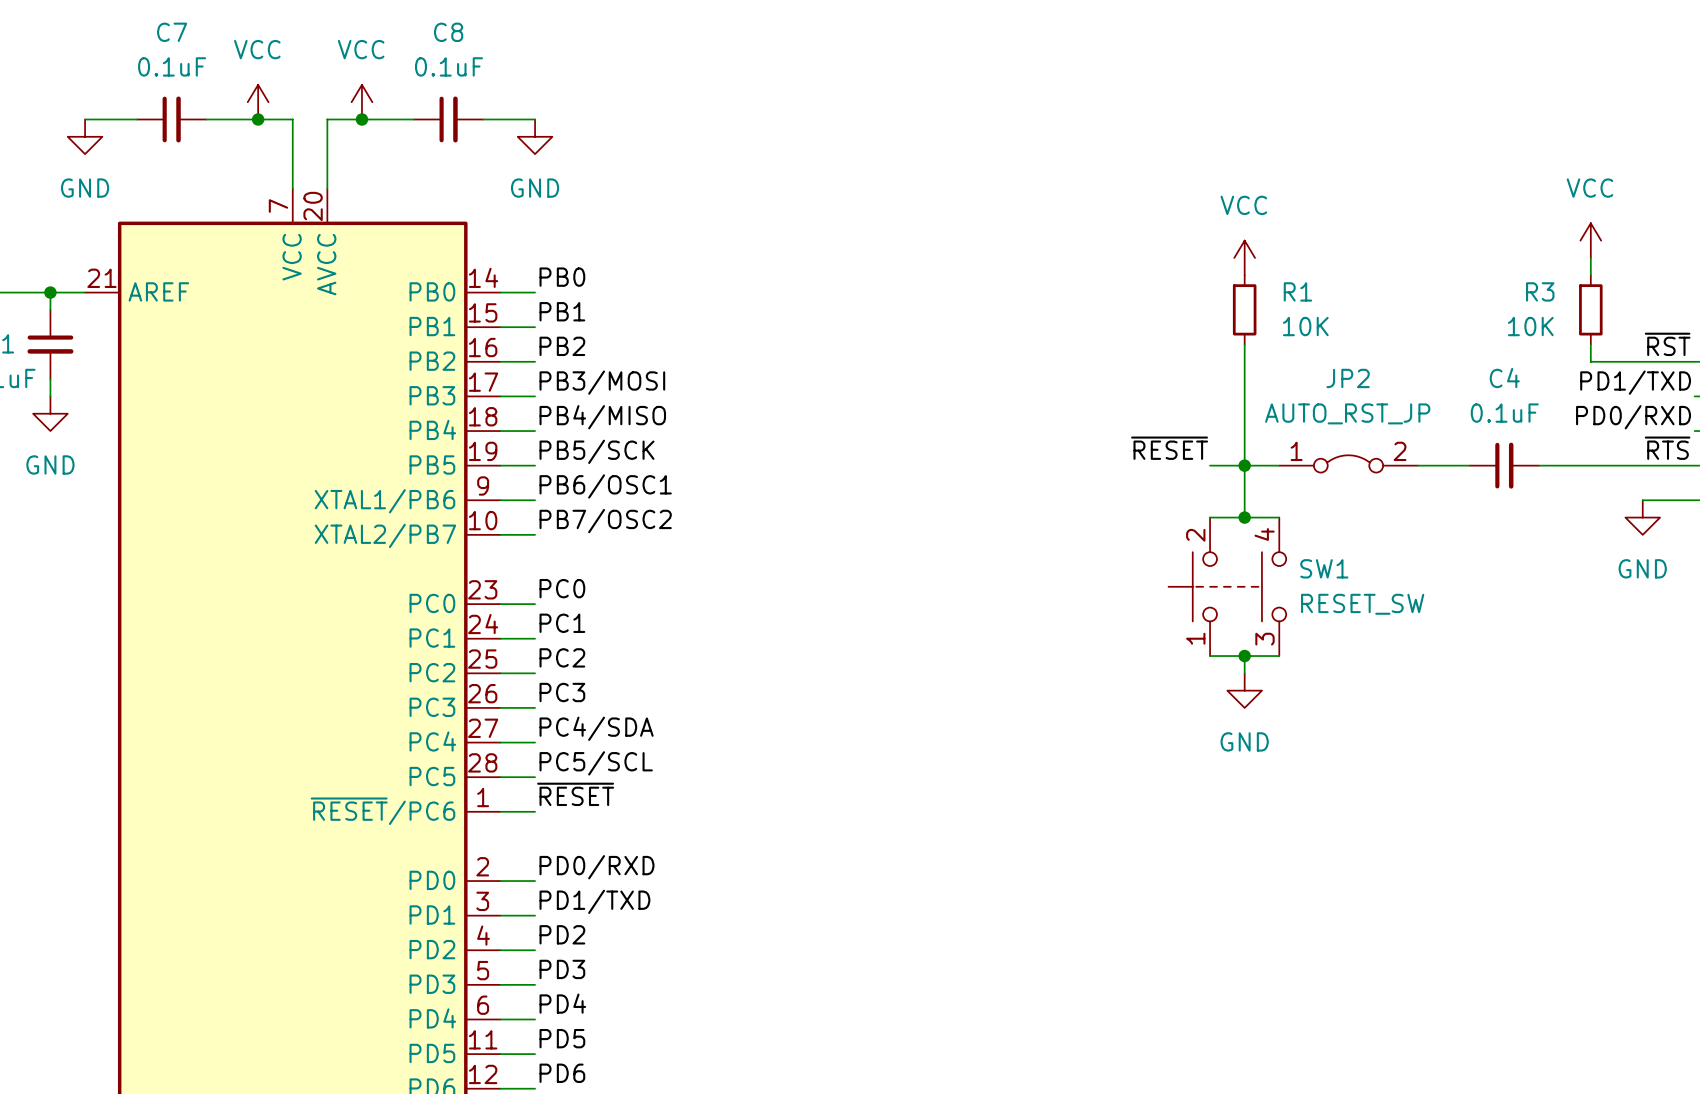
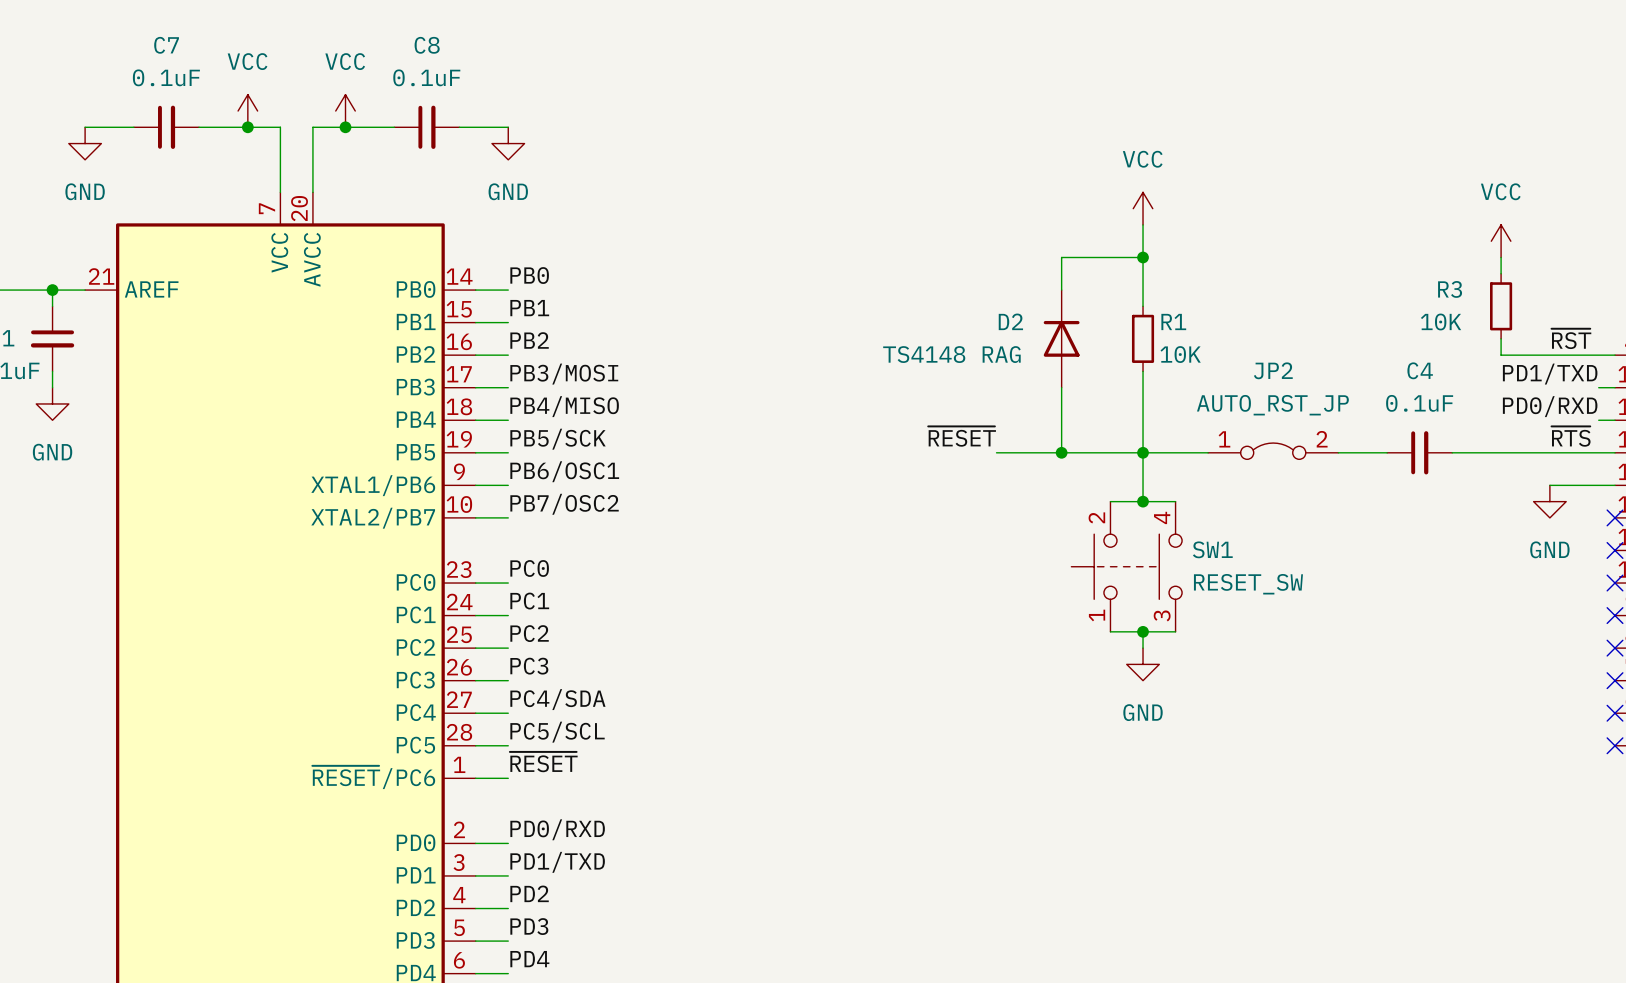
wire: none -> (1143, 224) (1143, 306)
wire: none -> (1143, 257) (1061, 257) (1061, 290)
junction: none -> (1143, 257)
power symbol position: VCC (1244, 257) -> VCC (1143, 208)
R1 name position: R1 (1297, 291) -> R1 (1173, 321)
R1 position: (1244, 309) -> (1143, 338)
R1 value position: 10K (1305, 326) -> 10K (1180, 354)
D2: none -> TS4148 RAG (1061, 338)
wire: (1244, 344) (1244, 517) (1279, 517) -> none
wire: none -> (1143, 371) (1143, 501) (1110, 501)
wire: none -> (1061, 387) (1061, 452)
label position: ~{RESET} (1169, 448) -> ~{RESET} (962, 436)
wire: none -> (996, 452) (1143, 452)
junction: none -> (1061, 452)
junction: none -> (1143, 452)
junction: (1244, 465) -> none
junction: none -> (1143, 501)
junction: (1244, 517) -> none
SW1 position: (1227, 586) -> (1126, 566)
wire: none -> (1110, 631) (1143, 631) (1143, 648)
junction position: (1244, 656) -> (1143, 631)
wire: (1279, 656) (1244, 656) (1244, 673) -> none
power symbol position: GND (1244, 690) -> GND (1143, 664)

